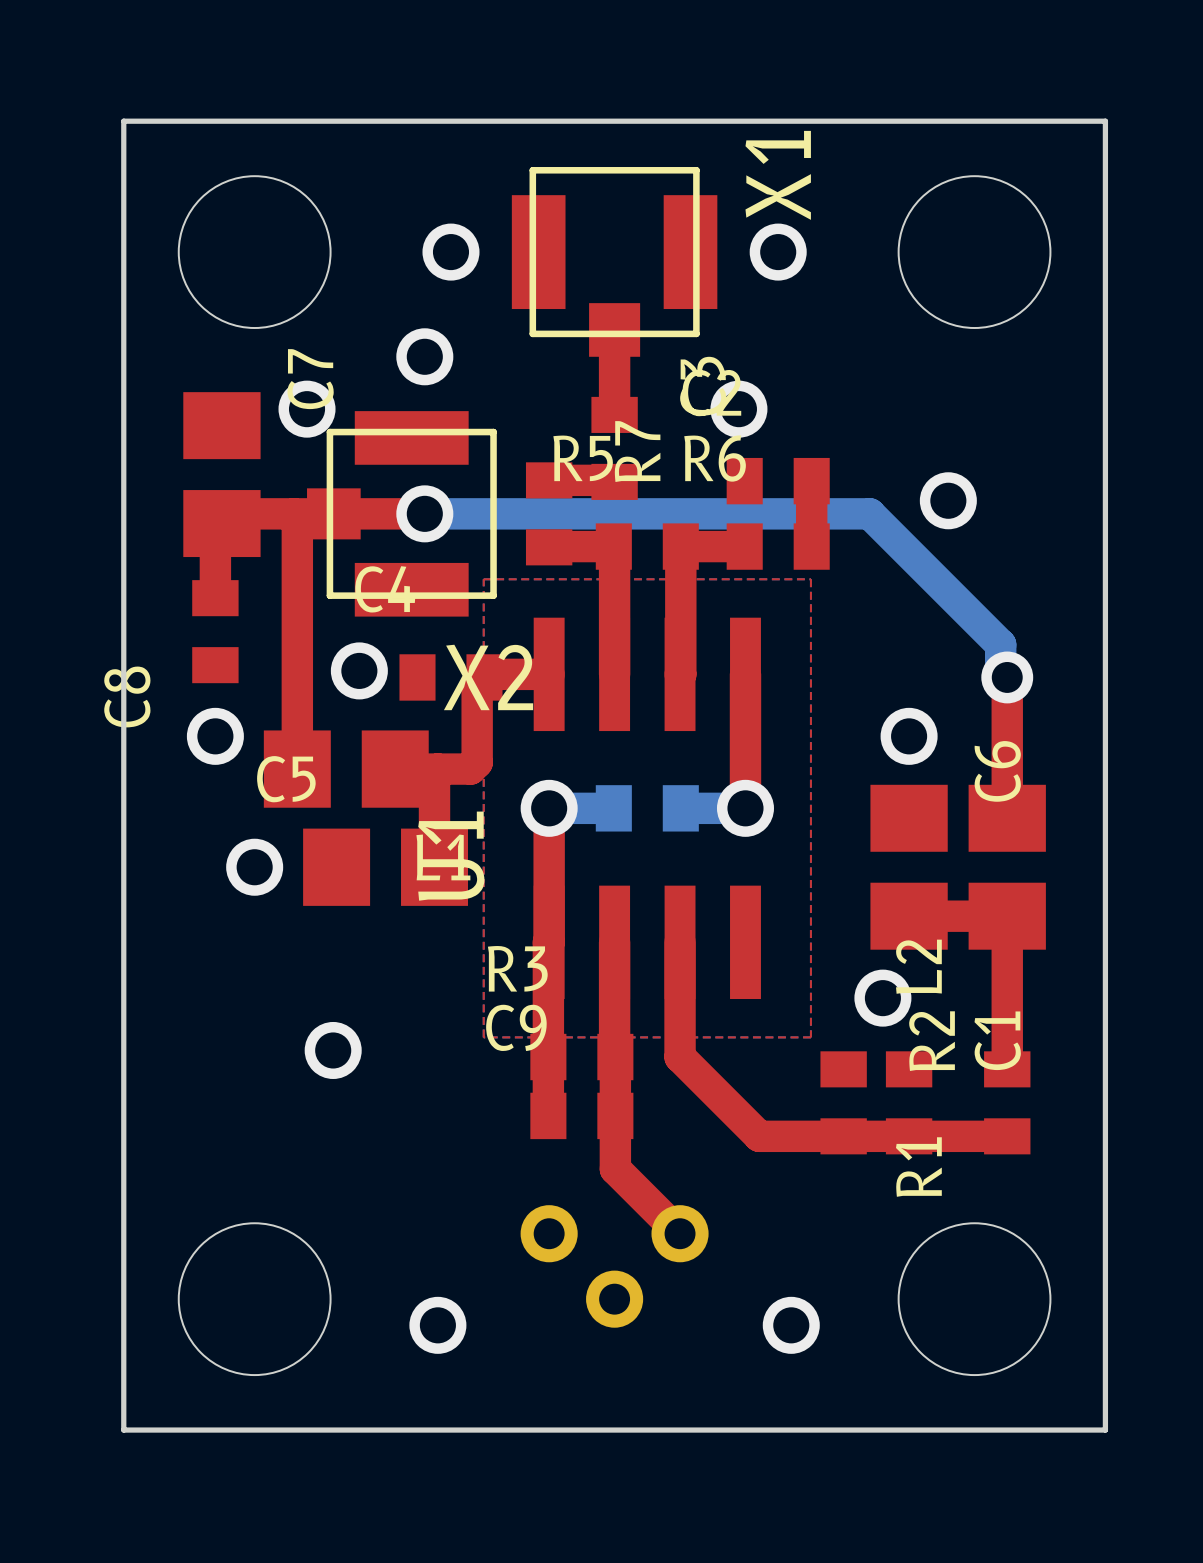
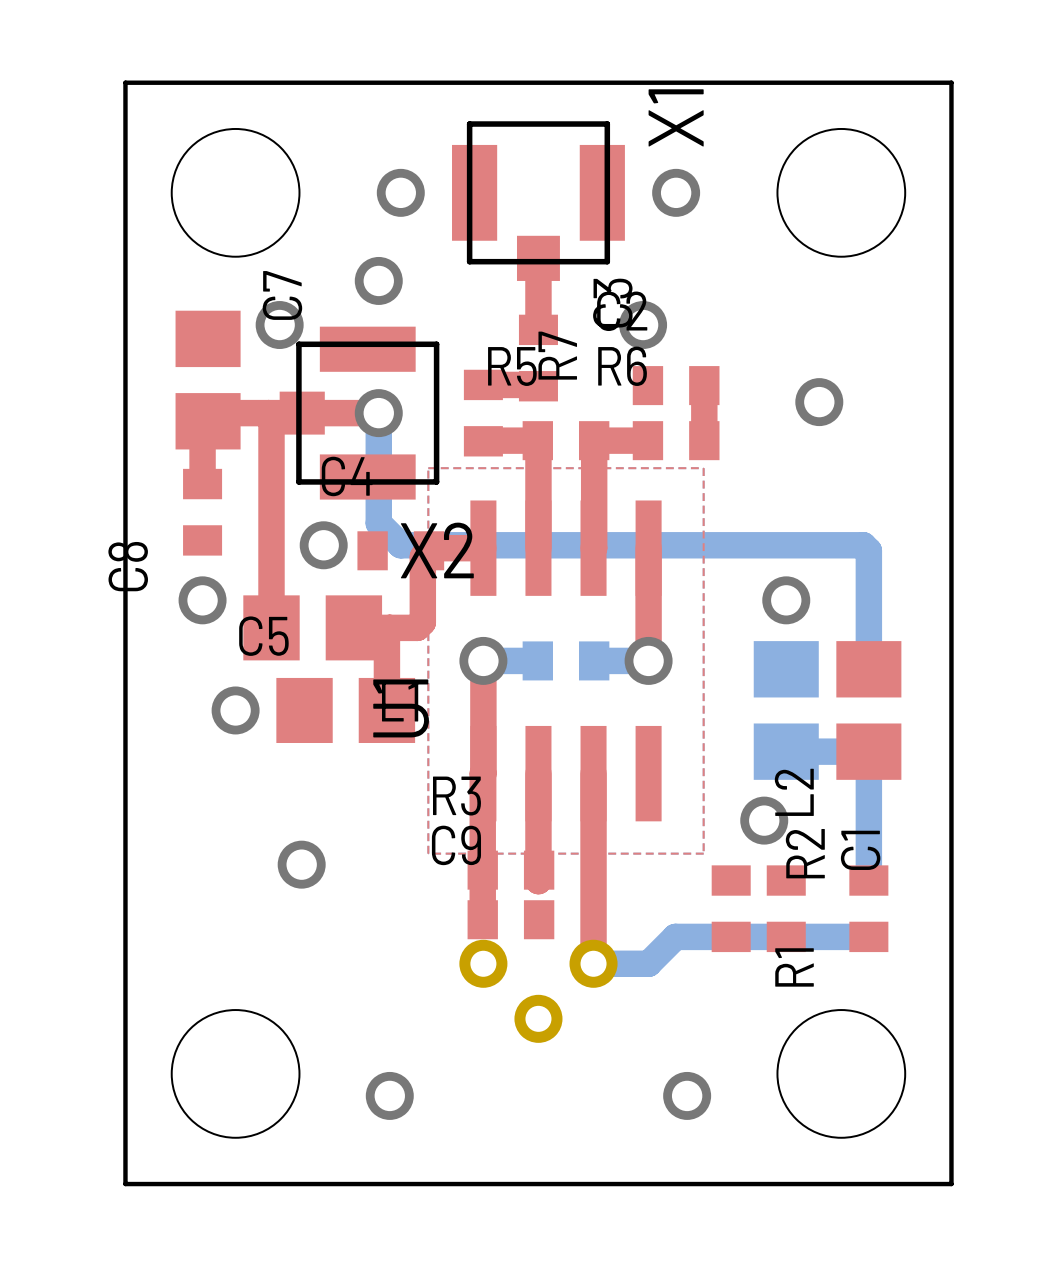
bottom track: (424, 513) (869, 513) (1000, 644) (1000, 670) -> (378, 413) (378, 523) (400, 545) (863, 545)
top track: (1007, 677) (1007, 818) -> none
bottom track: none -> (868, 550) (868, 669)
via: (1007, 677) -> none
C6 side: top (909, 867) -> bottom (786, 710)
top track: (909, 916) (1007, 916) (1007, 1069) -> none
bottom track: none -> (786, 751) (868, 751) (868, 880)
top track: (680, 1057) (759, 1136) (1007, 1136) -> (593, 870) (593, 963)
top track: (615, 1070) (615, 1169) (680, 1233) -> none
bottom track: none -> (868, 936) (675, 936) (648, 963) (593, 963)
part position: (614, 1266) -> (538, 991)

